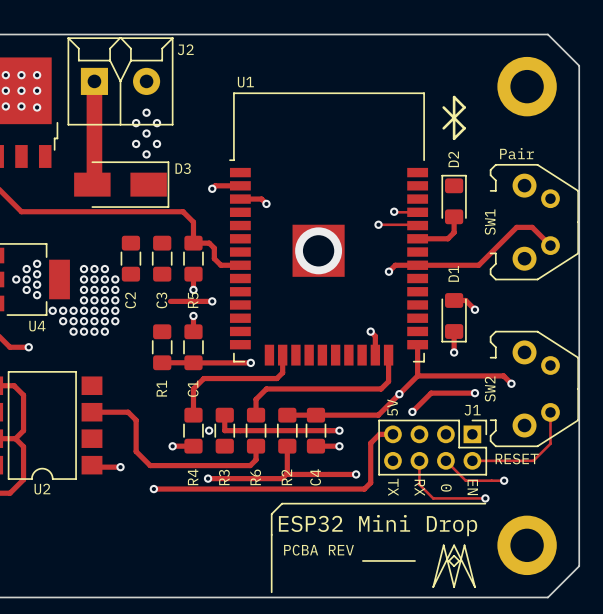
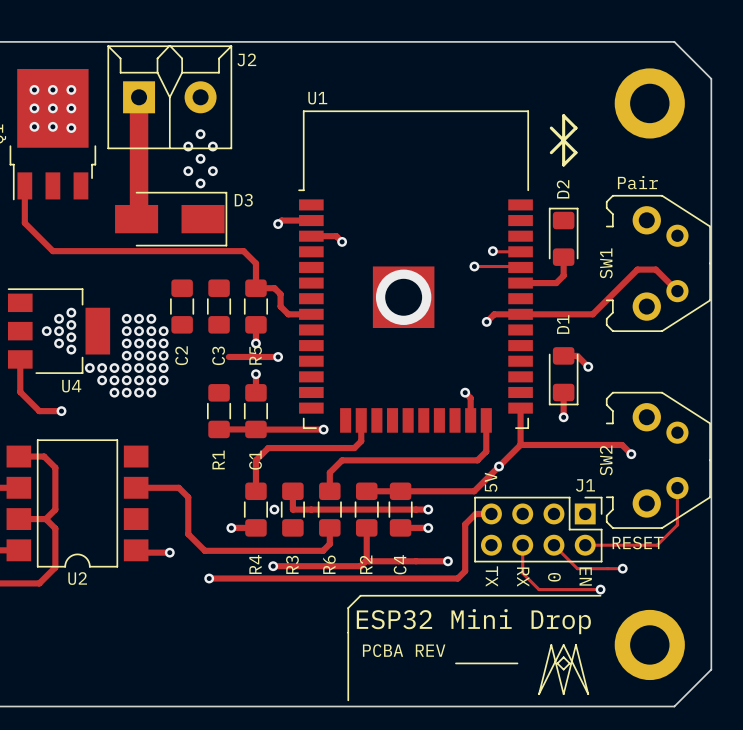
track: (474, 393) (431, 393) (412, 411) -> none
via: (474, 393) -> none
via: (412, 411) -> none

